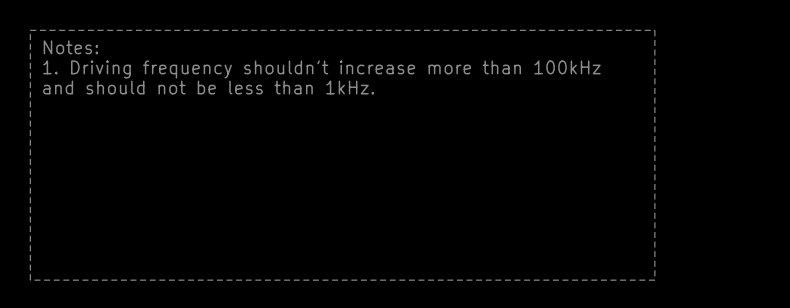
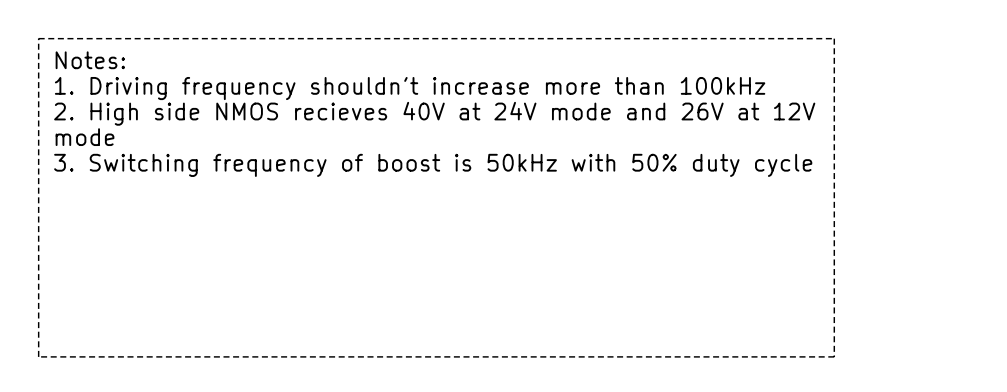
text: and should not be less than 1kHz. (208, 87) -> 2. High side NMOS recieves 40V at 24V mode and 26V at 12V (434, 113)
text: none -> mode (85, 137)
text: none -> 3. Switching frequency of boost is 50kHz with 50% duty cycle (433, 165)

